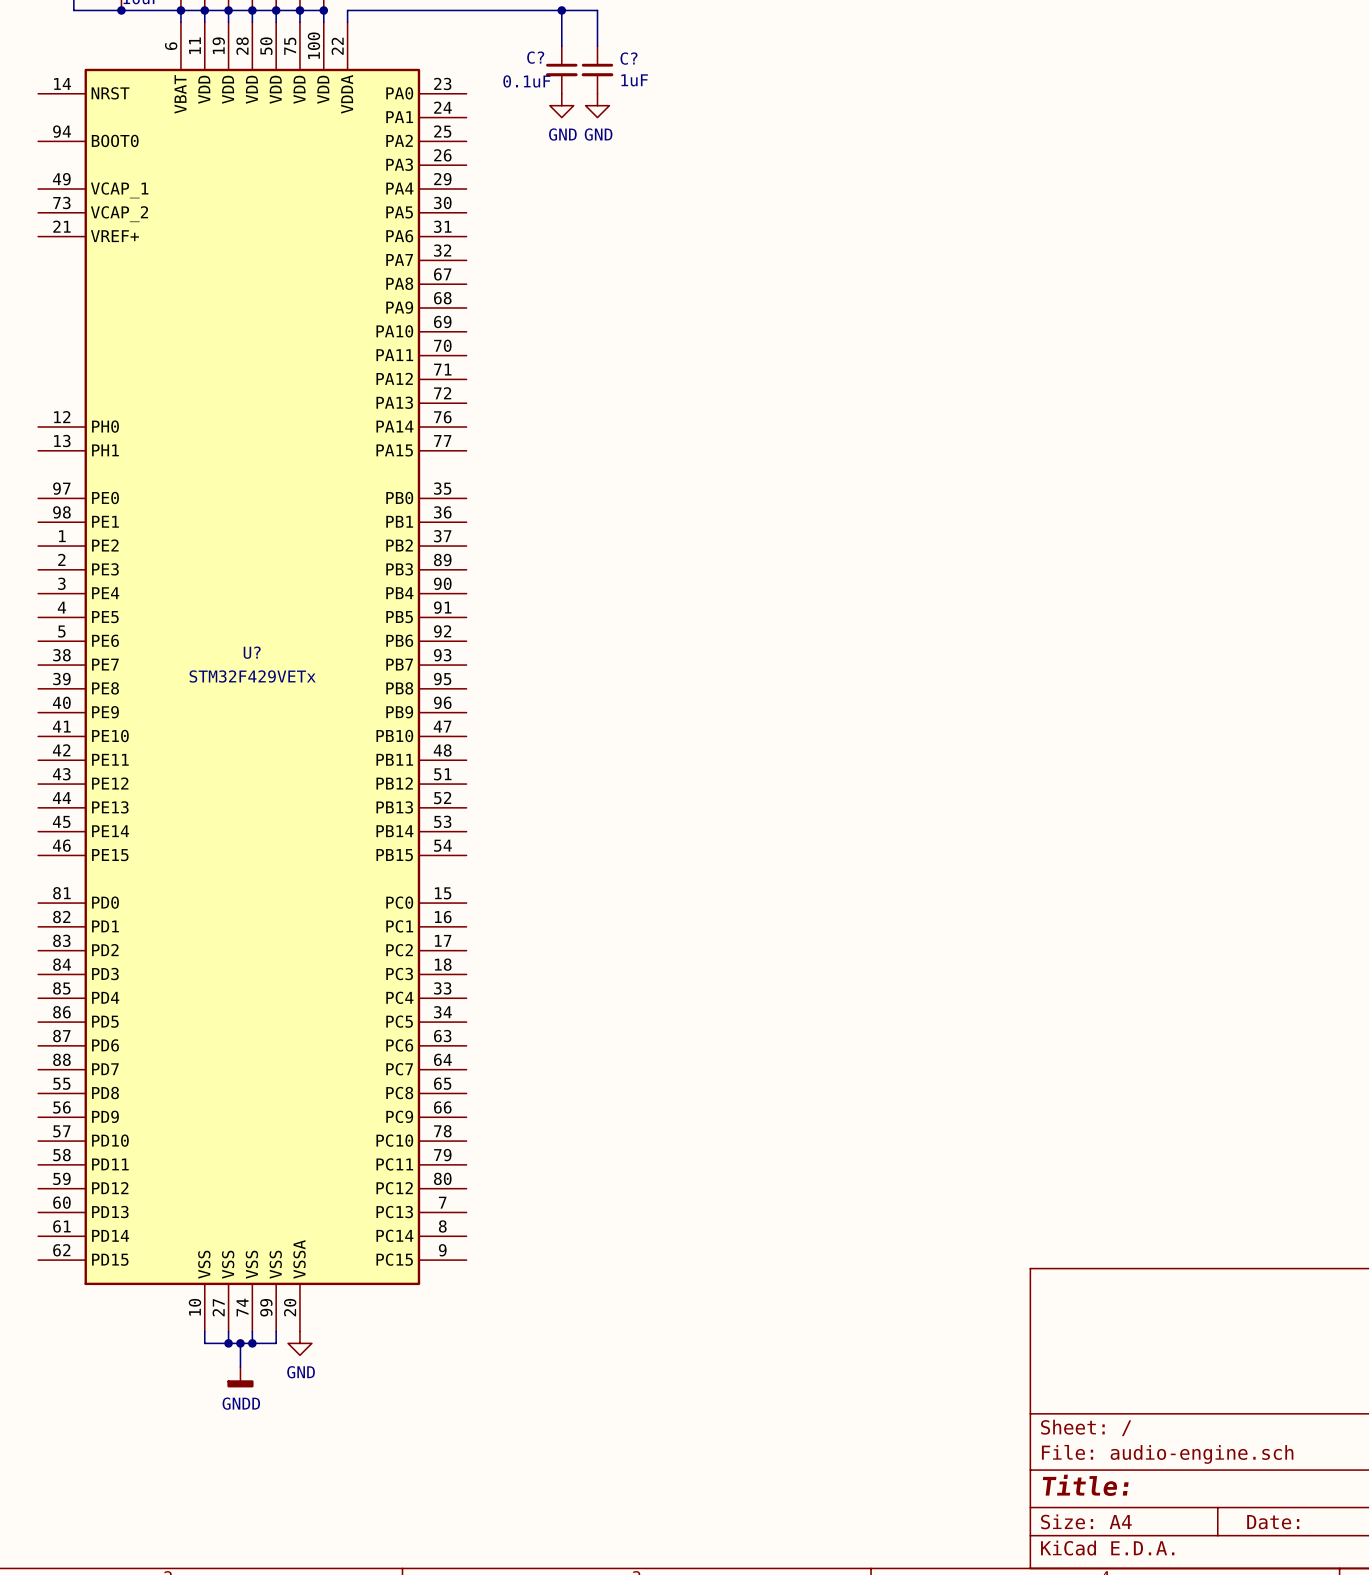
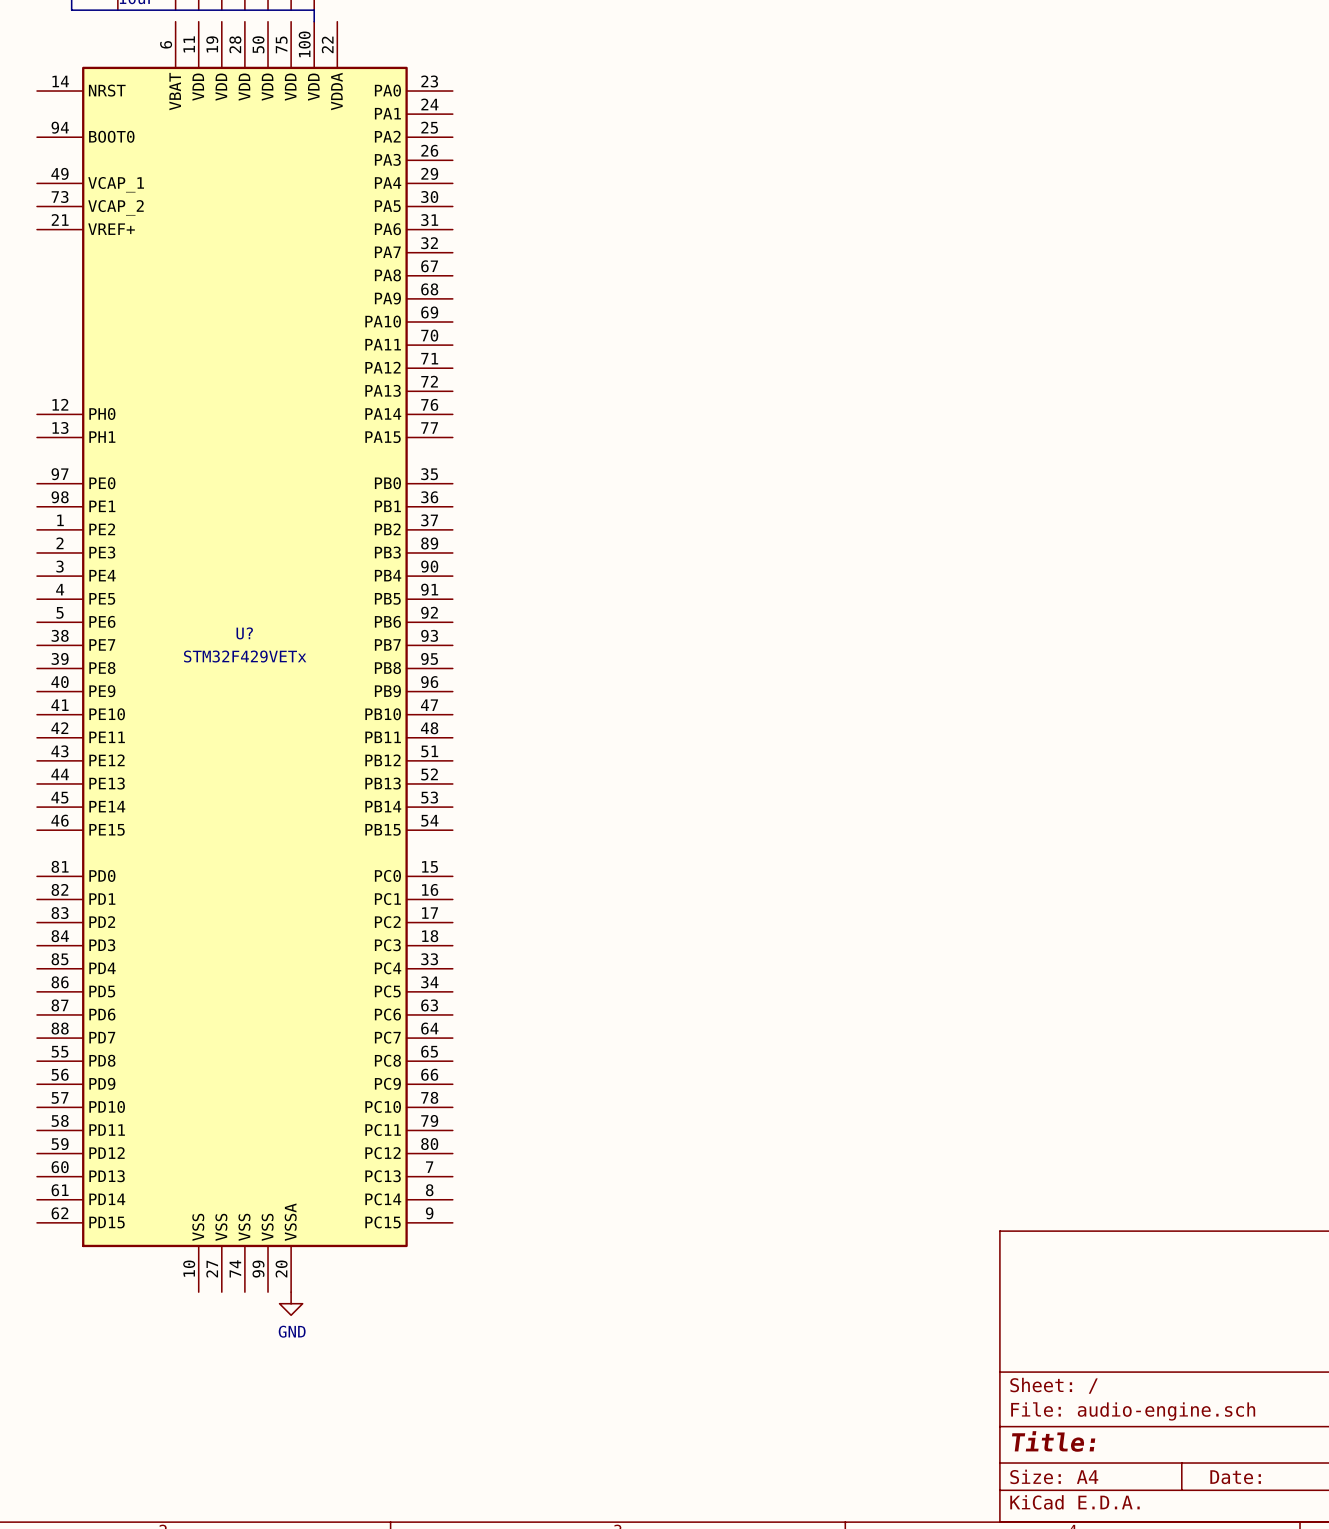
junction: (121, 10) -> none
wire: (180, 10) (180, 22) -> none
junction: (180, 10) -> none
wire: (204, 10) (204, 22) -> none
junction: (204, 10) -> none
wire: (228, 10) (228, 22) -> none
junction: (228, 10) -> none
wire: (252, 10) (252, 22) -> none
junction: (252, 10) -> none
wire: (276, 10) (276, 22) -> none
junction: (276, 10) -> none
wire: (299, 10) (299, 22) -> none
junction: (299, 10) -> none
junction: (323, 10) -> none
wire: (561, 10) (561, 46) -> none
junction: (561, 10) -> none
wire: (347, 22) (347, 10) (597, 10) (597, 46) -> none
C?: 0.1uF (561, 69) -> none
C?: 1uF (597, 69) -> none
power symbol: GND (561, 105) -> none
power symbol: GND (597, 105) -> none
wire: (204, 1331) (204, 1343) (276, 1343) (276, 1331) -> none
wire: (228, 1331) (228, 1343) -> none
wire: (252, 1331) (252, 1343) -> none
junction: (228, 1343) -> none
wire: (240, 1343) (240, 1367) -> none
junction: (240, 1343) -> none
junction: (252, 1343) -> none
power symbol: GNDD (240, 1377) -> none

